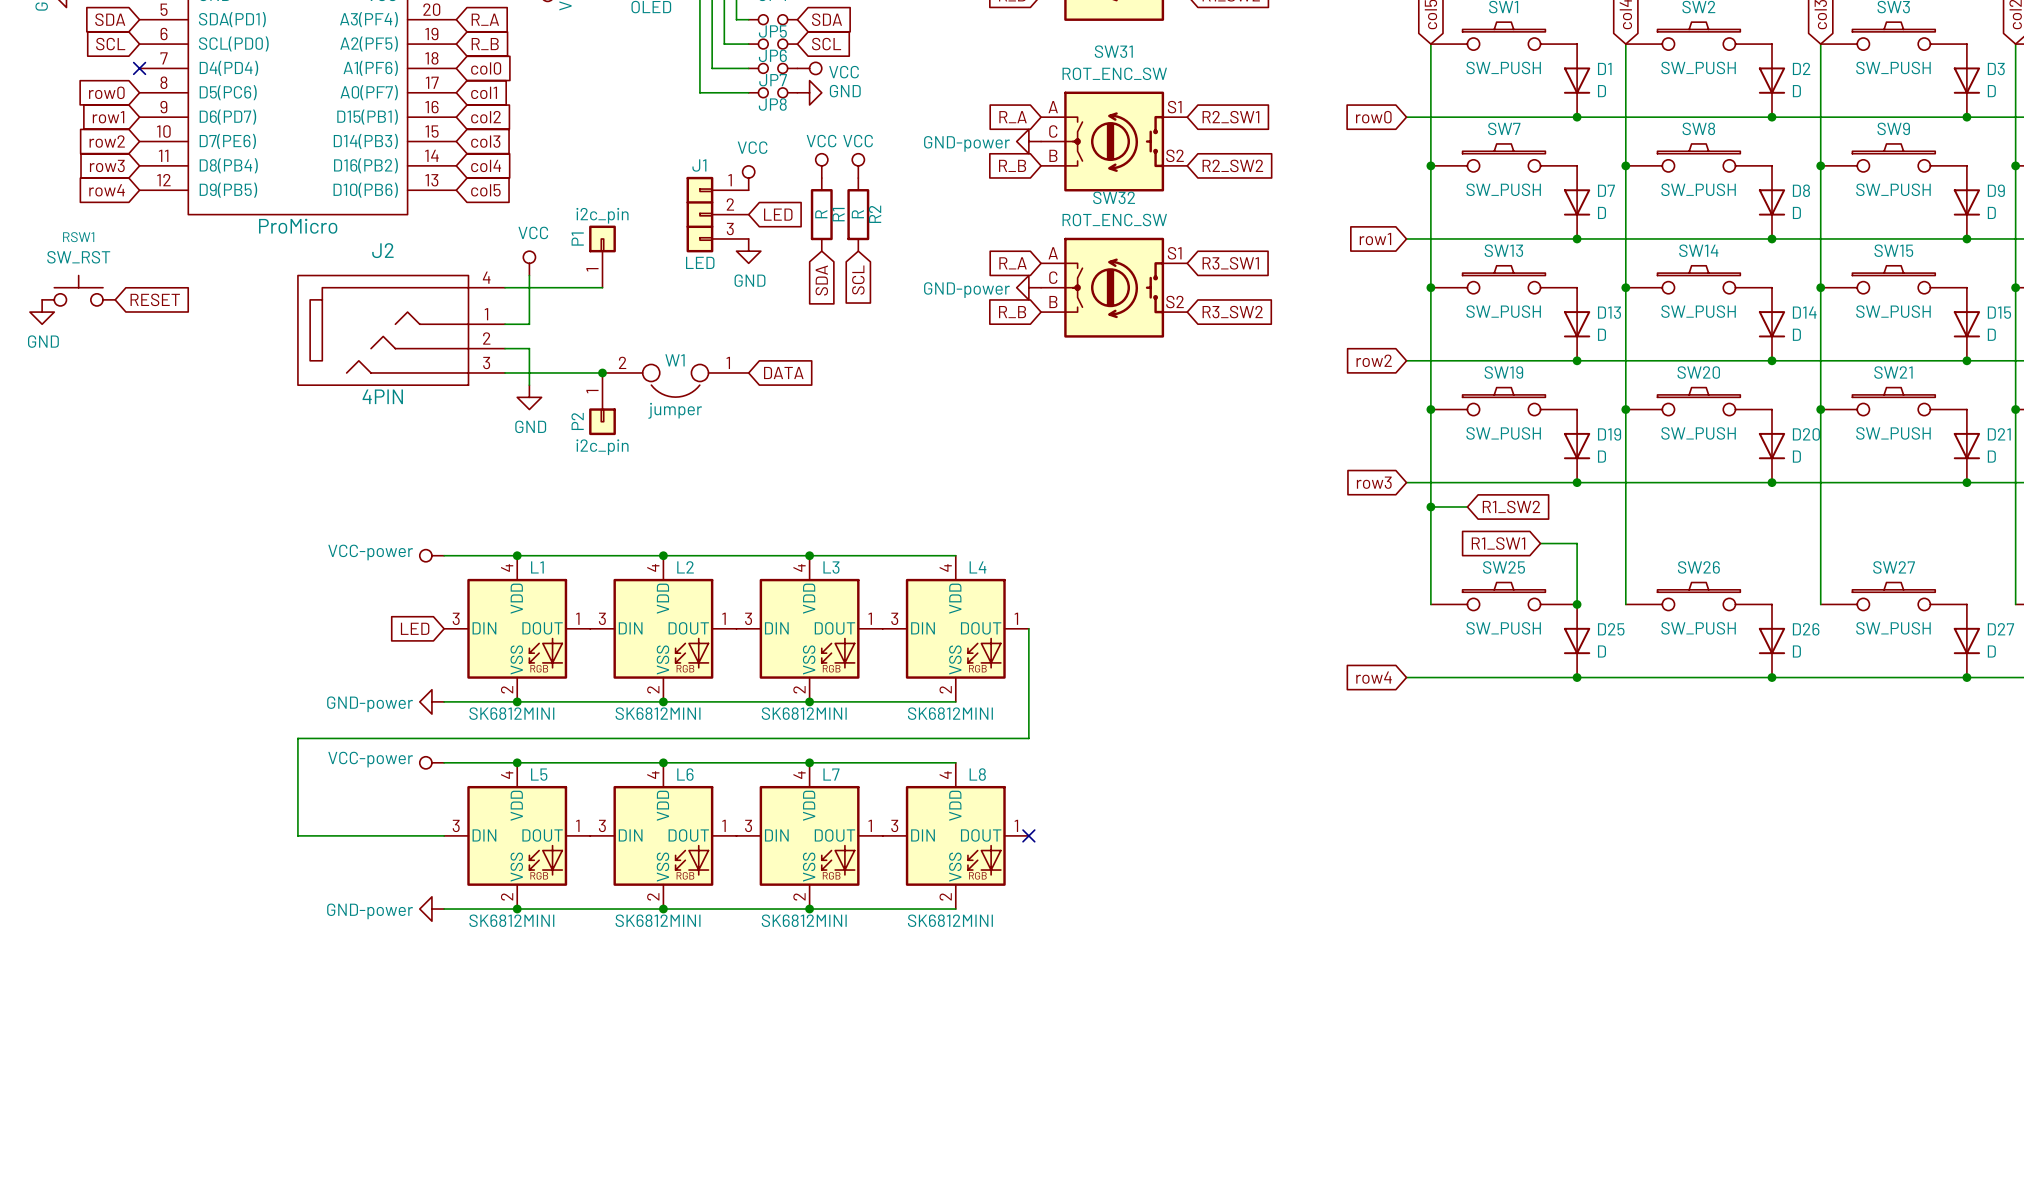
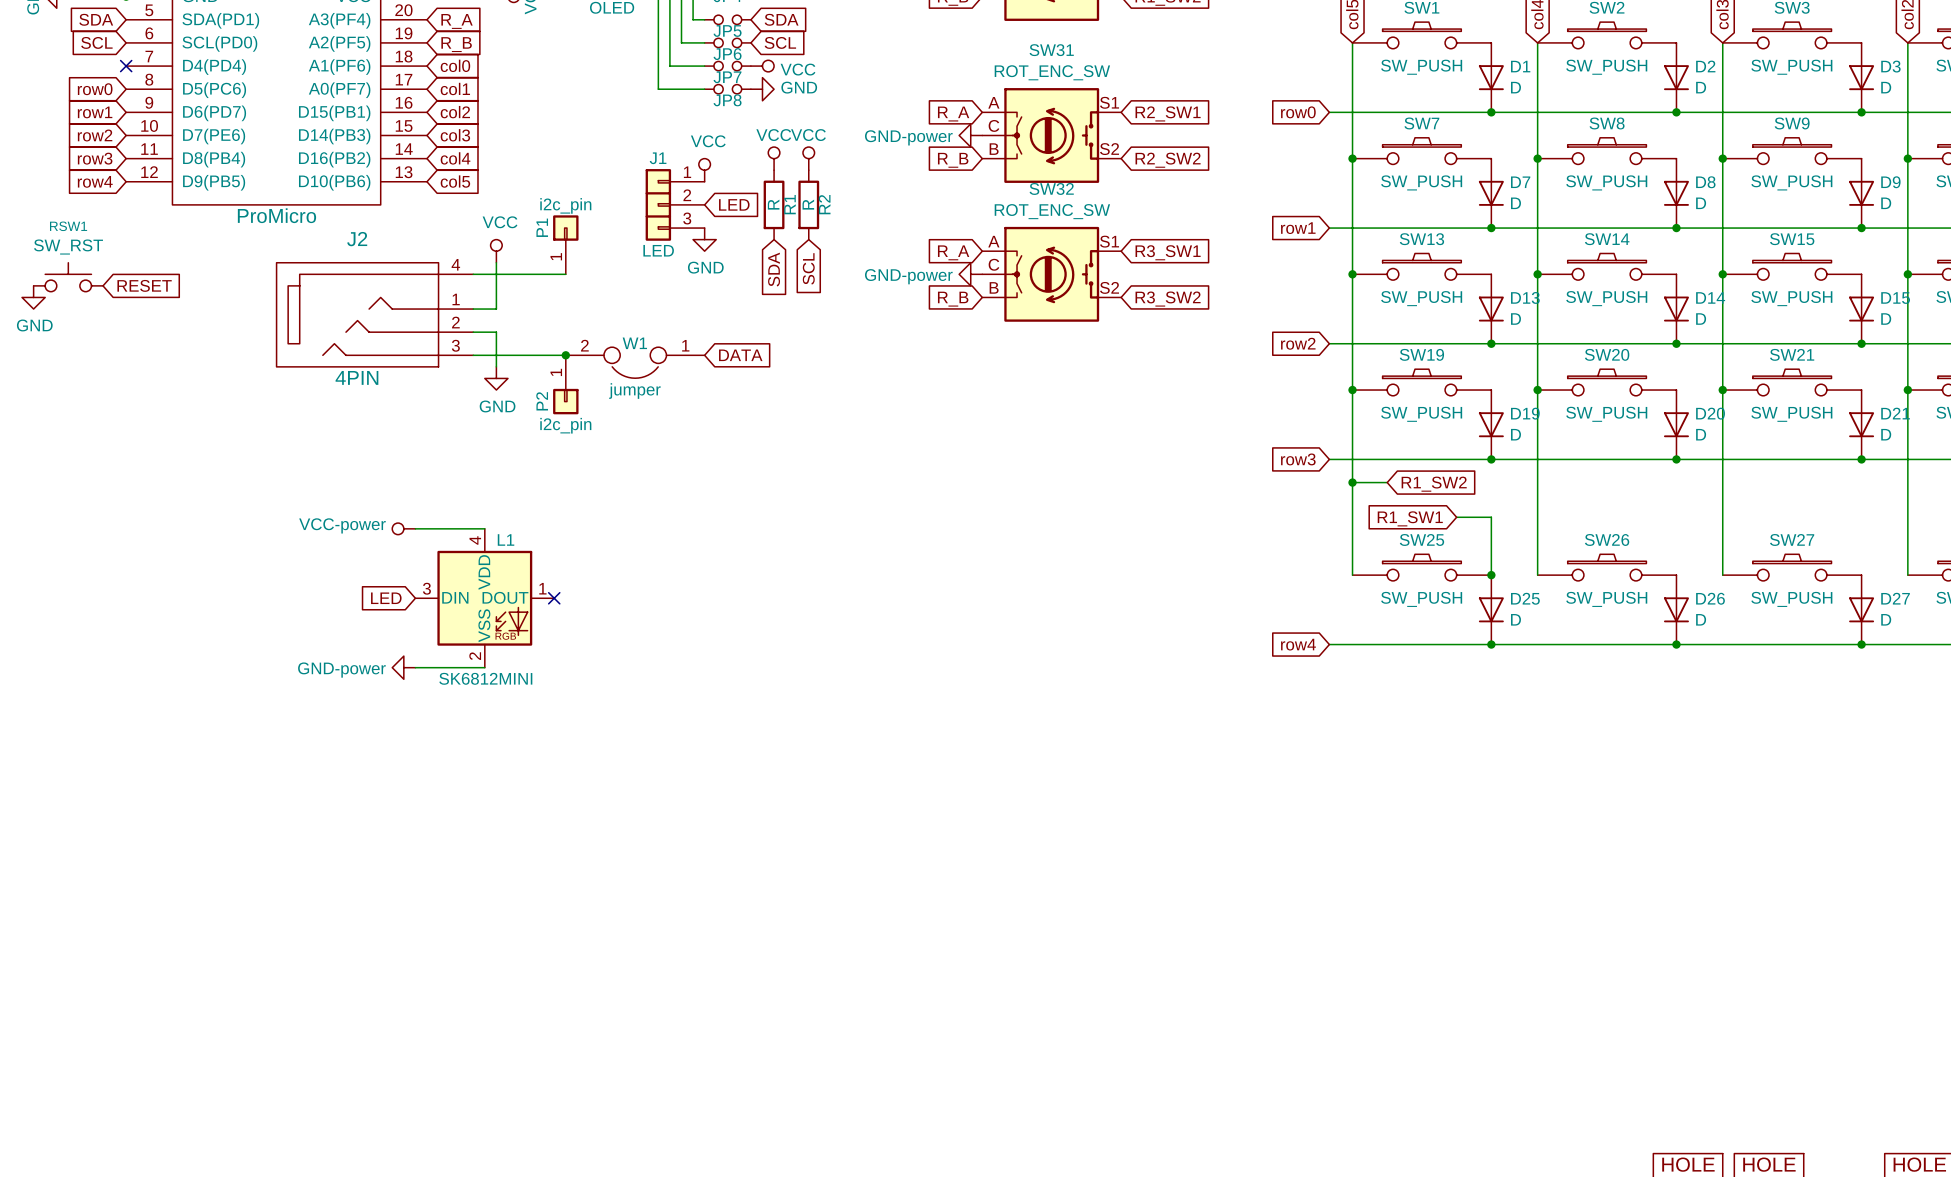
wire: (517, 555) (955, 555) -> none
junction: (517, 555) -> none
junction: (663, 555) -> none
junction: (809, 555) -> none
no-connect mark: none -> (554, 598)
L2: SK6812MINI (663, 628) -> none
L3: SK6812MINI (809, 628) -> none
L4: SK6812MINI (955, 628) -> none
wire: (1028, 628) (1028, 738) (297, 738) (297, 835) (444, 835) -> none
wire: (517, 701) (955, 701) -> none
junction: (517, 701) -> none
junction: (663, 701) -> none
junction: (809, 701) -> none
power symbol: VCC-power (431, 762) -> none
wire: (444, 762) (955, 762) -> none
junction: (517, 762) -> none
junction: (663, 762) -> none
junction: (809, 762) -> none
L5: SK6812MINI (517, 835) -> none
L6: SK6812MINI (663, 835) -> none
L7: SK6812MINI (809, 835) -> none
L8: SK6812MINI (955, 835) -> none
no-connect mark: (1028, 835) -> none
power symbol: GND-power (431, 909) -> none
wire: (444, 909) (955, 909) -> none
junction: (517, 909) -> none
junction: (663, 909) -> none
junction: (809, 909) -> none

